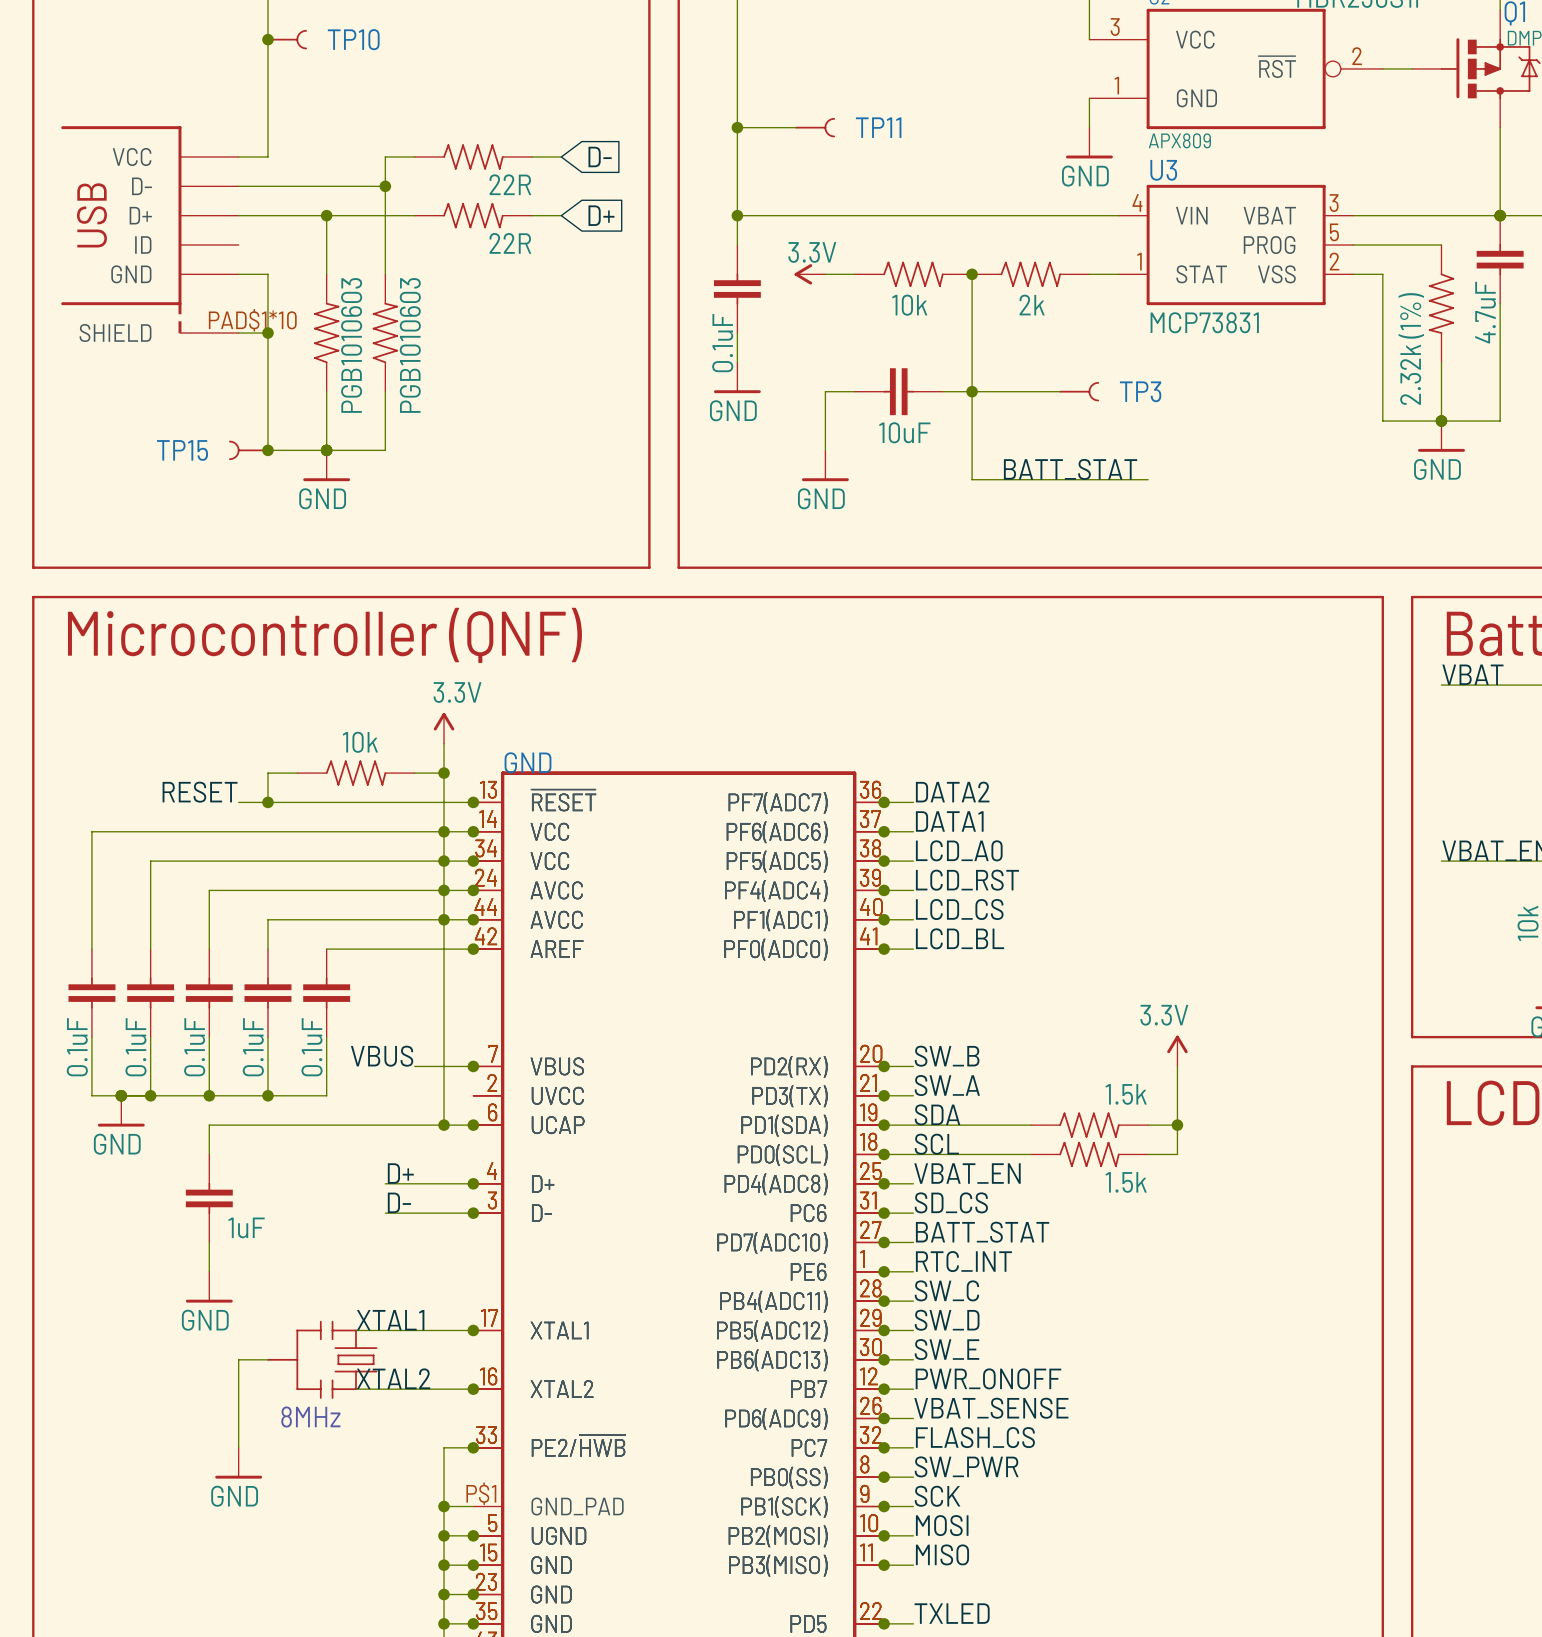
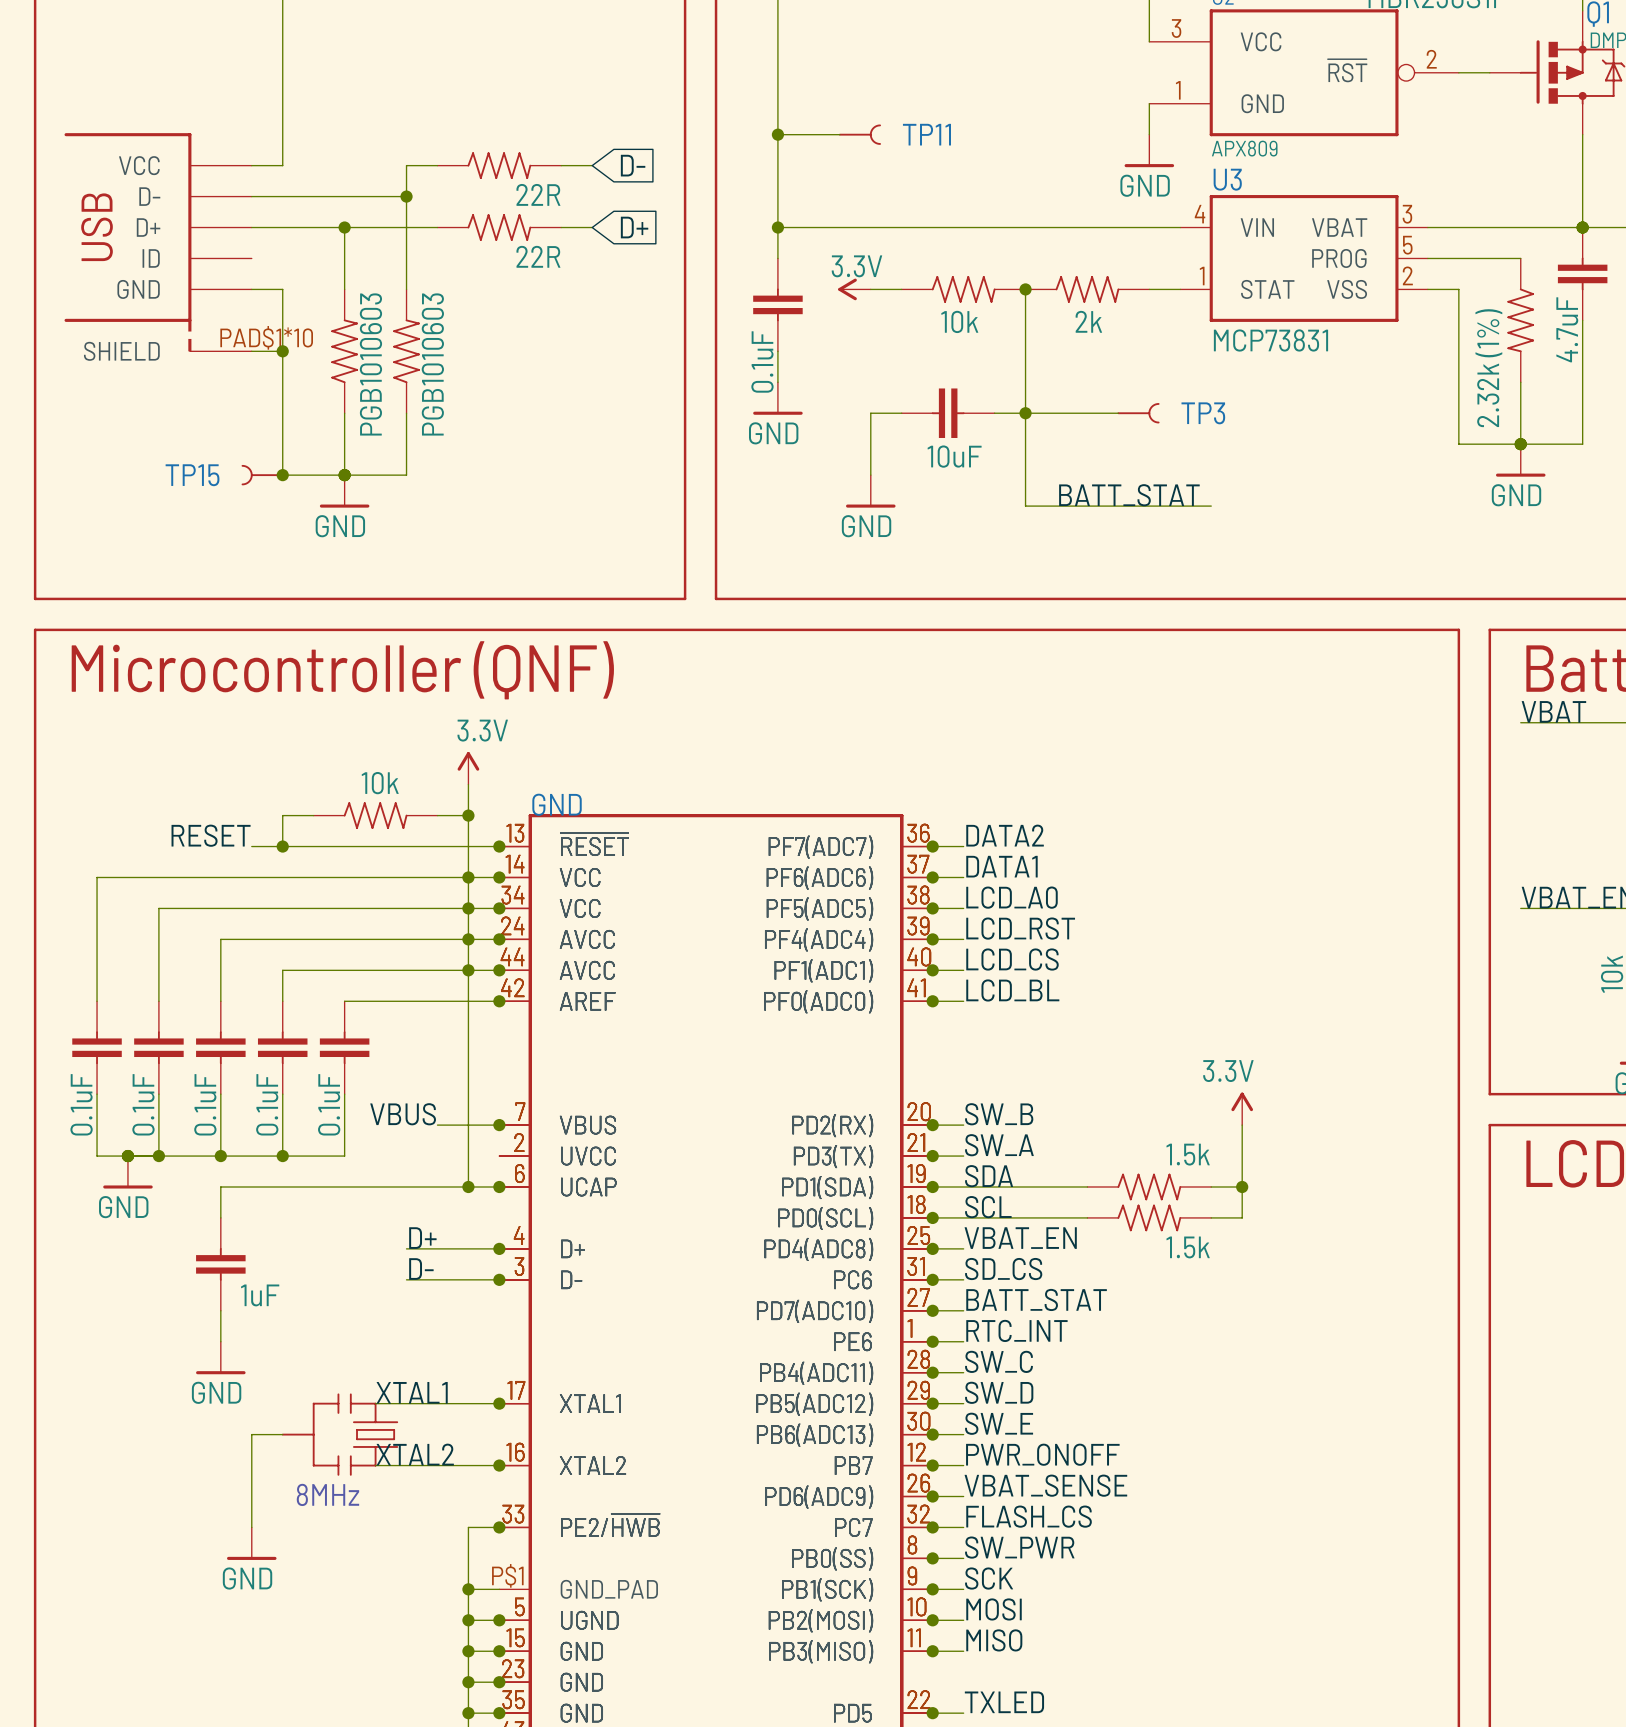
junction: (267, 39) -> none
TP10: (287, 39) -> none

